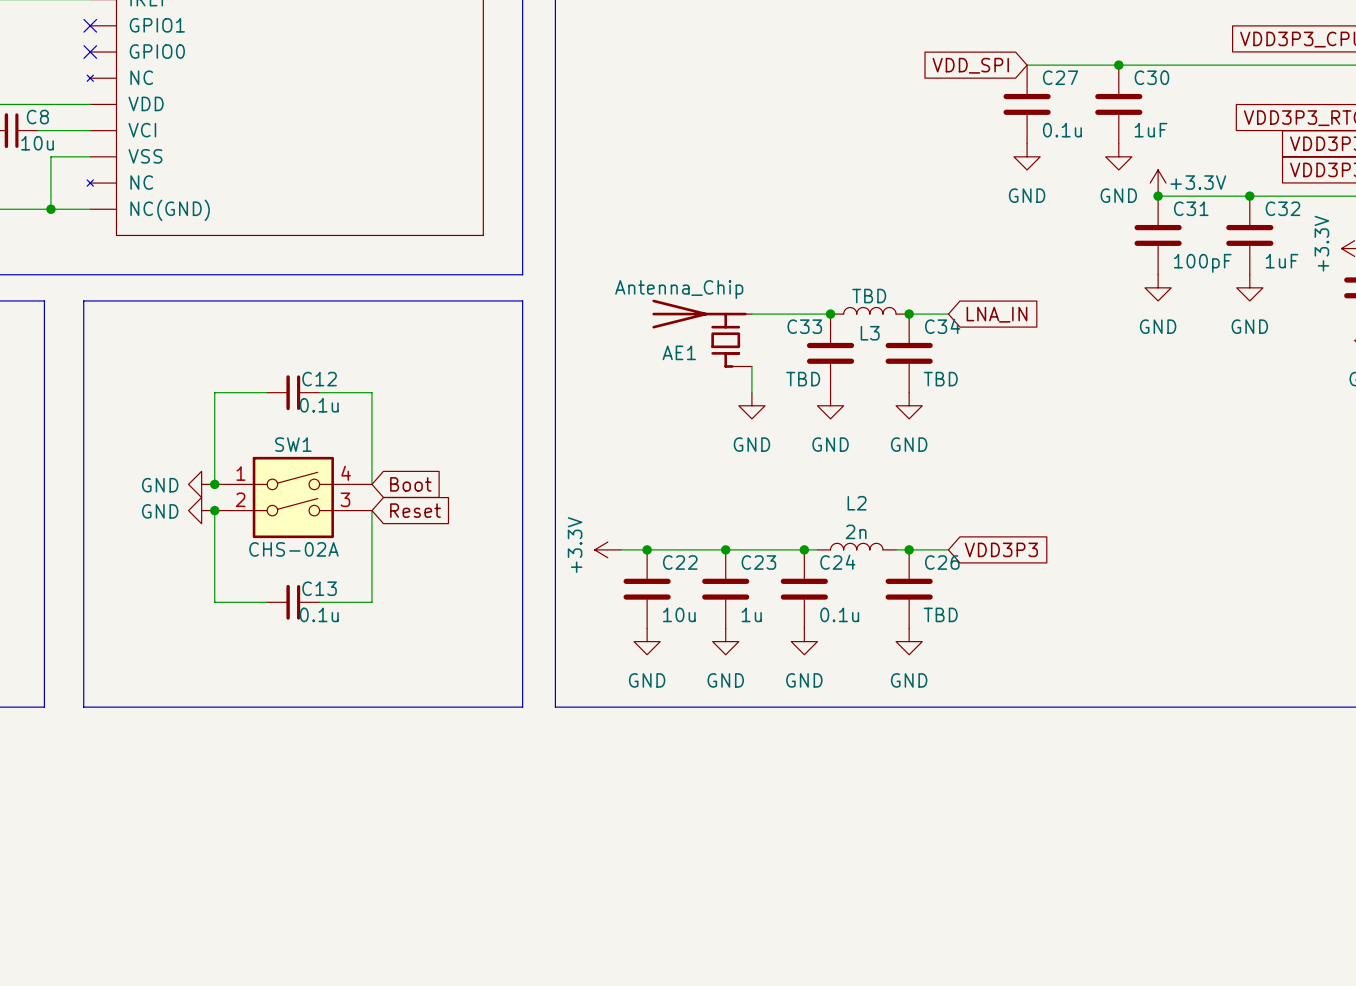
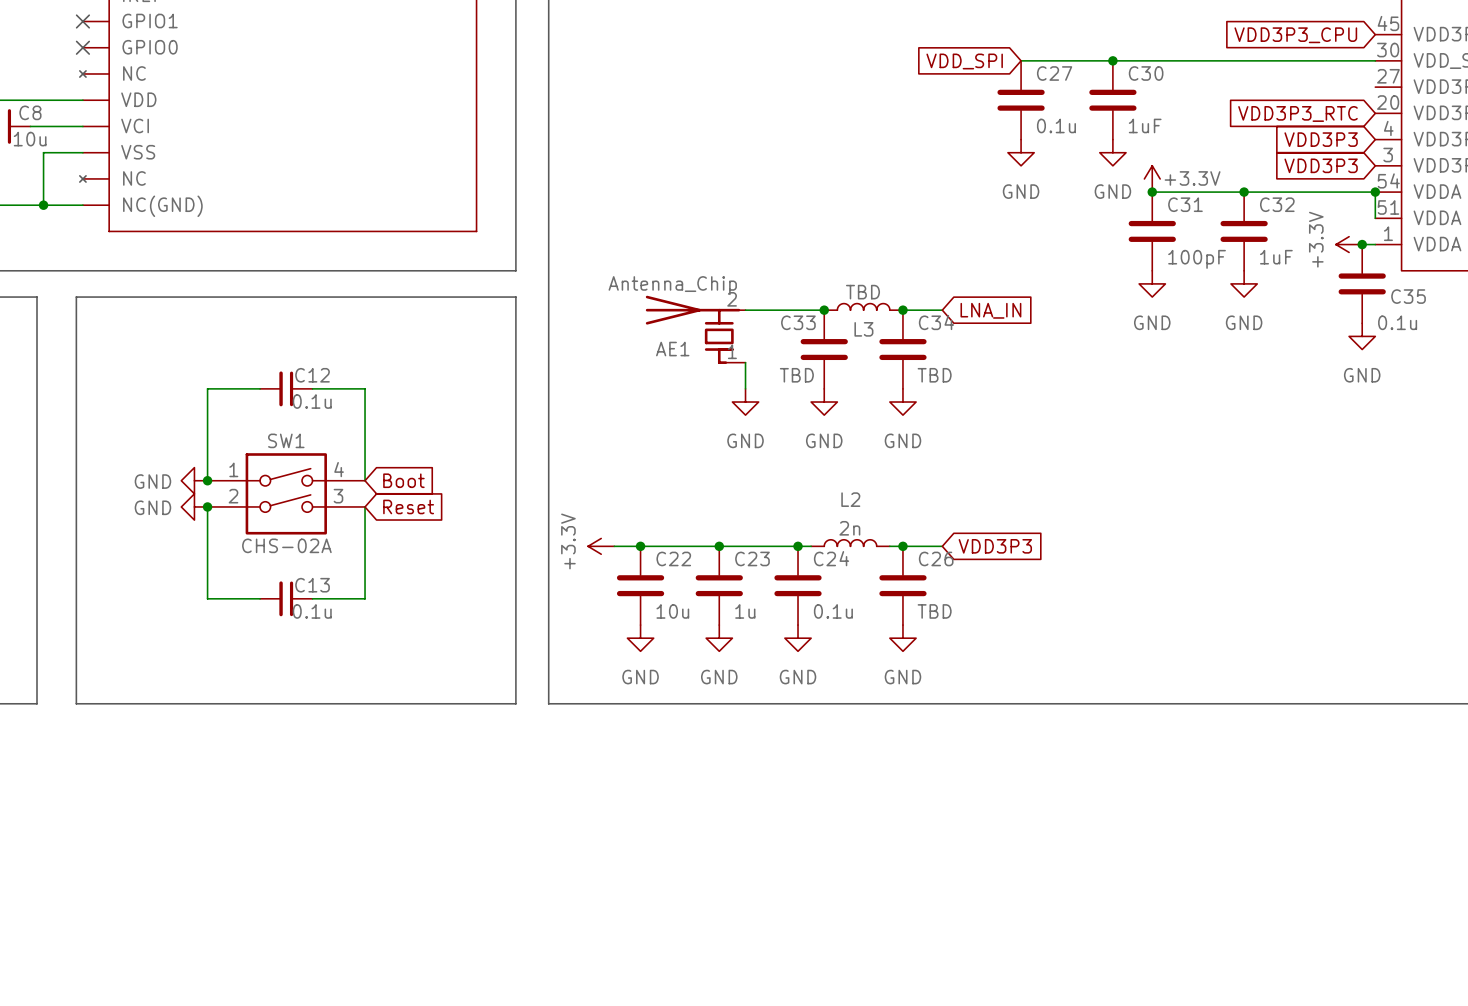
AE1 pin number: none -> 2 (732, 299)
AE1 pin number: none -> 1 (732, 351)

